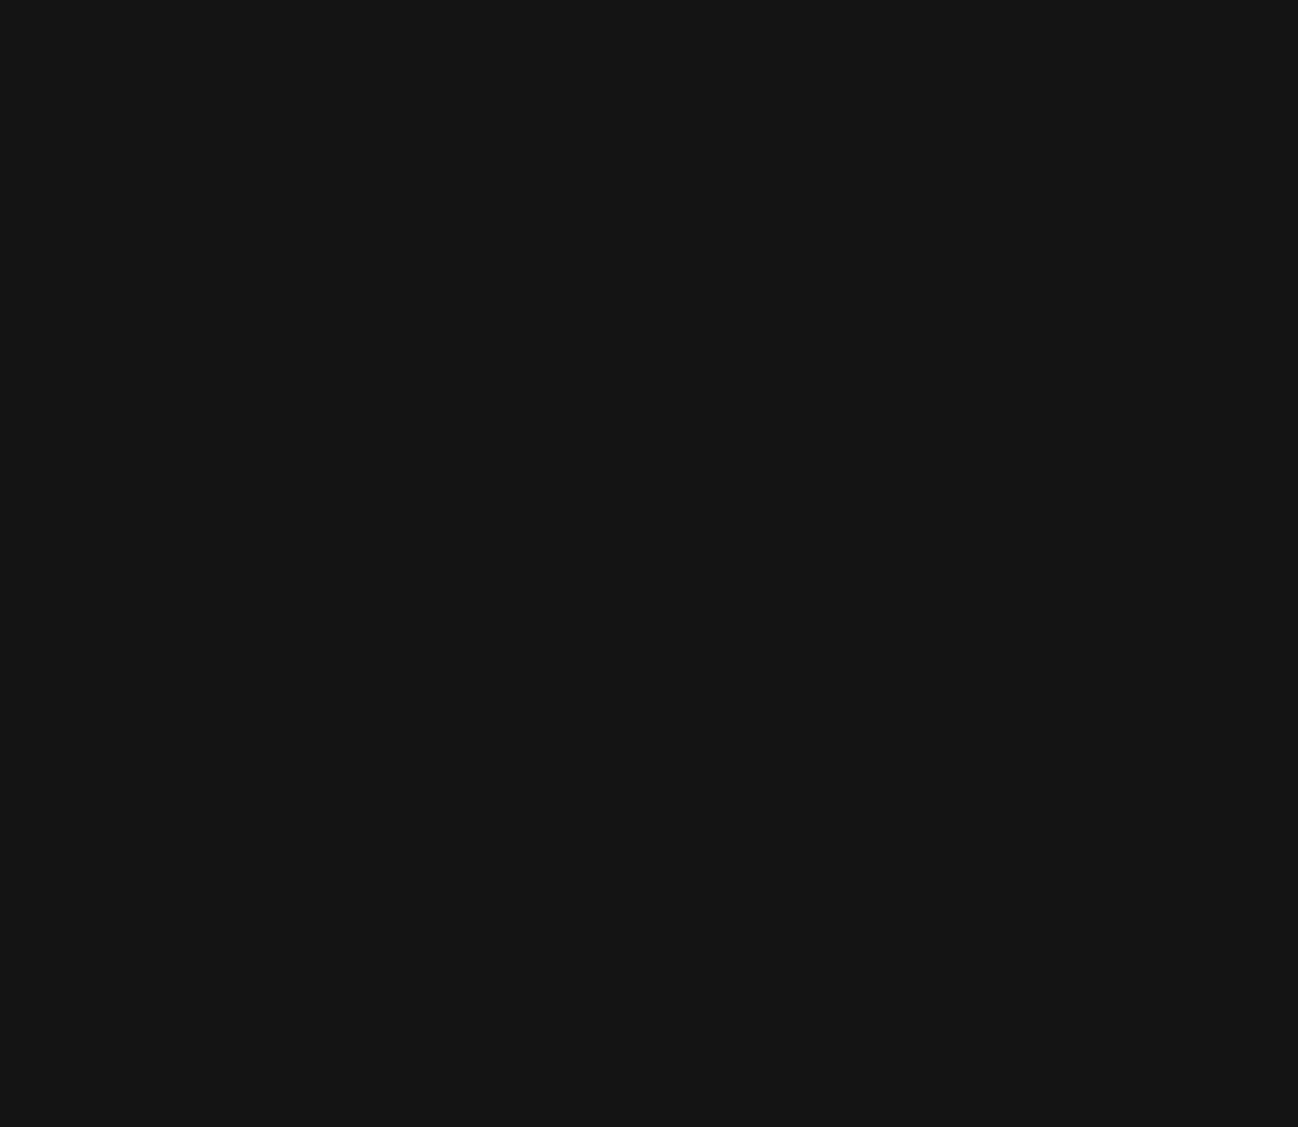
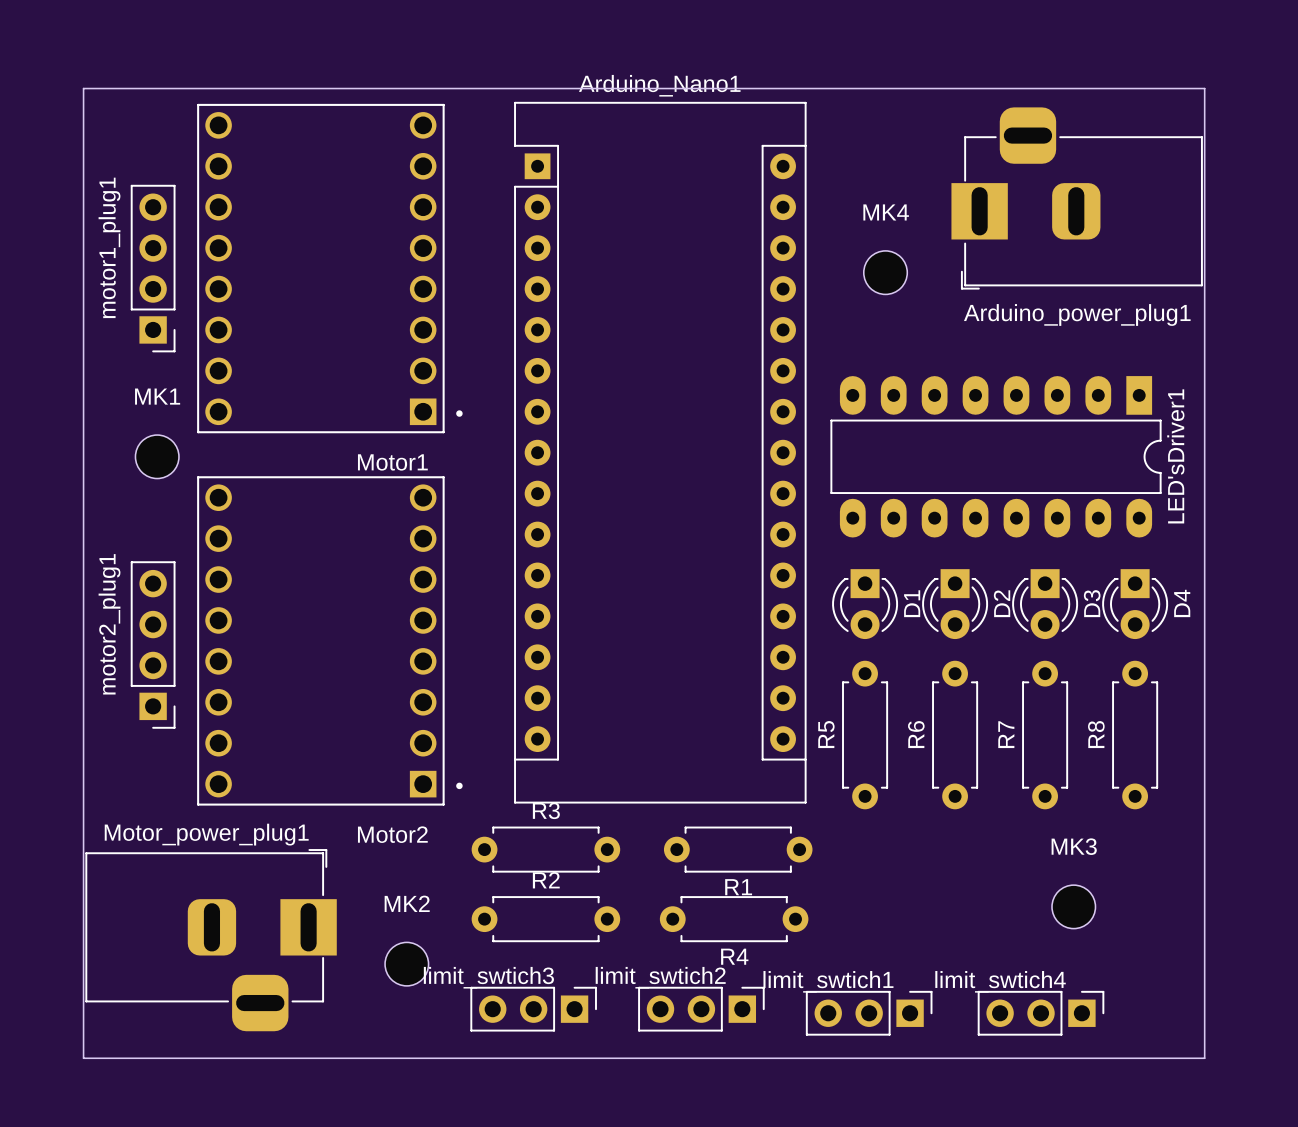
board edge: none -> (83, 88) (1204, 88) (1204, 1058) (83, 1058) (83, 88)
Arduino_power_plug1: none -> (1077, 198)
motor1_plug1: none -> (153, 268)
Motor1: none -> (329, 268)
MK4: none -> (885, 272)
Arduino_Nano1: none -> (660, 452)
MK1: none -> (157, 456)
LED'sDriver1: none -> (996, 456)
D1: none -> (865, 604)
D2: none -> (955, 604)
D3: none -> (1045, 604)
D4: none -> (1135, 604)
Motor2: none -> (329, 640)
motor2_plug1: none -> (153, 645)
R5: none -> (865, 735)
R6: none -> (955, 735)
R7: none -> (1045, 735)
R8: none -> (1135, 735)
R3: none -> (545, 849)
R1: none -> (738, 849)
MK3: none -> (1073, 906)
R2: none -> (545, 919)
R4: none -> (734, 919)
Motor_power_plug1: none -> (211, 940)
MK2: none -> (406, 964)
limit_swtich3: none -> (533, 1009)
limit_swtich2: none -> (701, 1009)
limit_swtich1: none -> (869, 1013)
limit_swtich4: none -> (1041, 1013)

